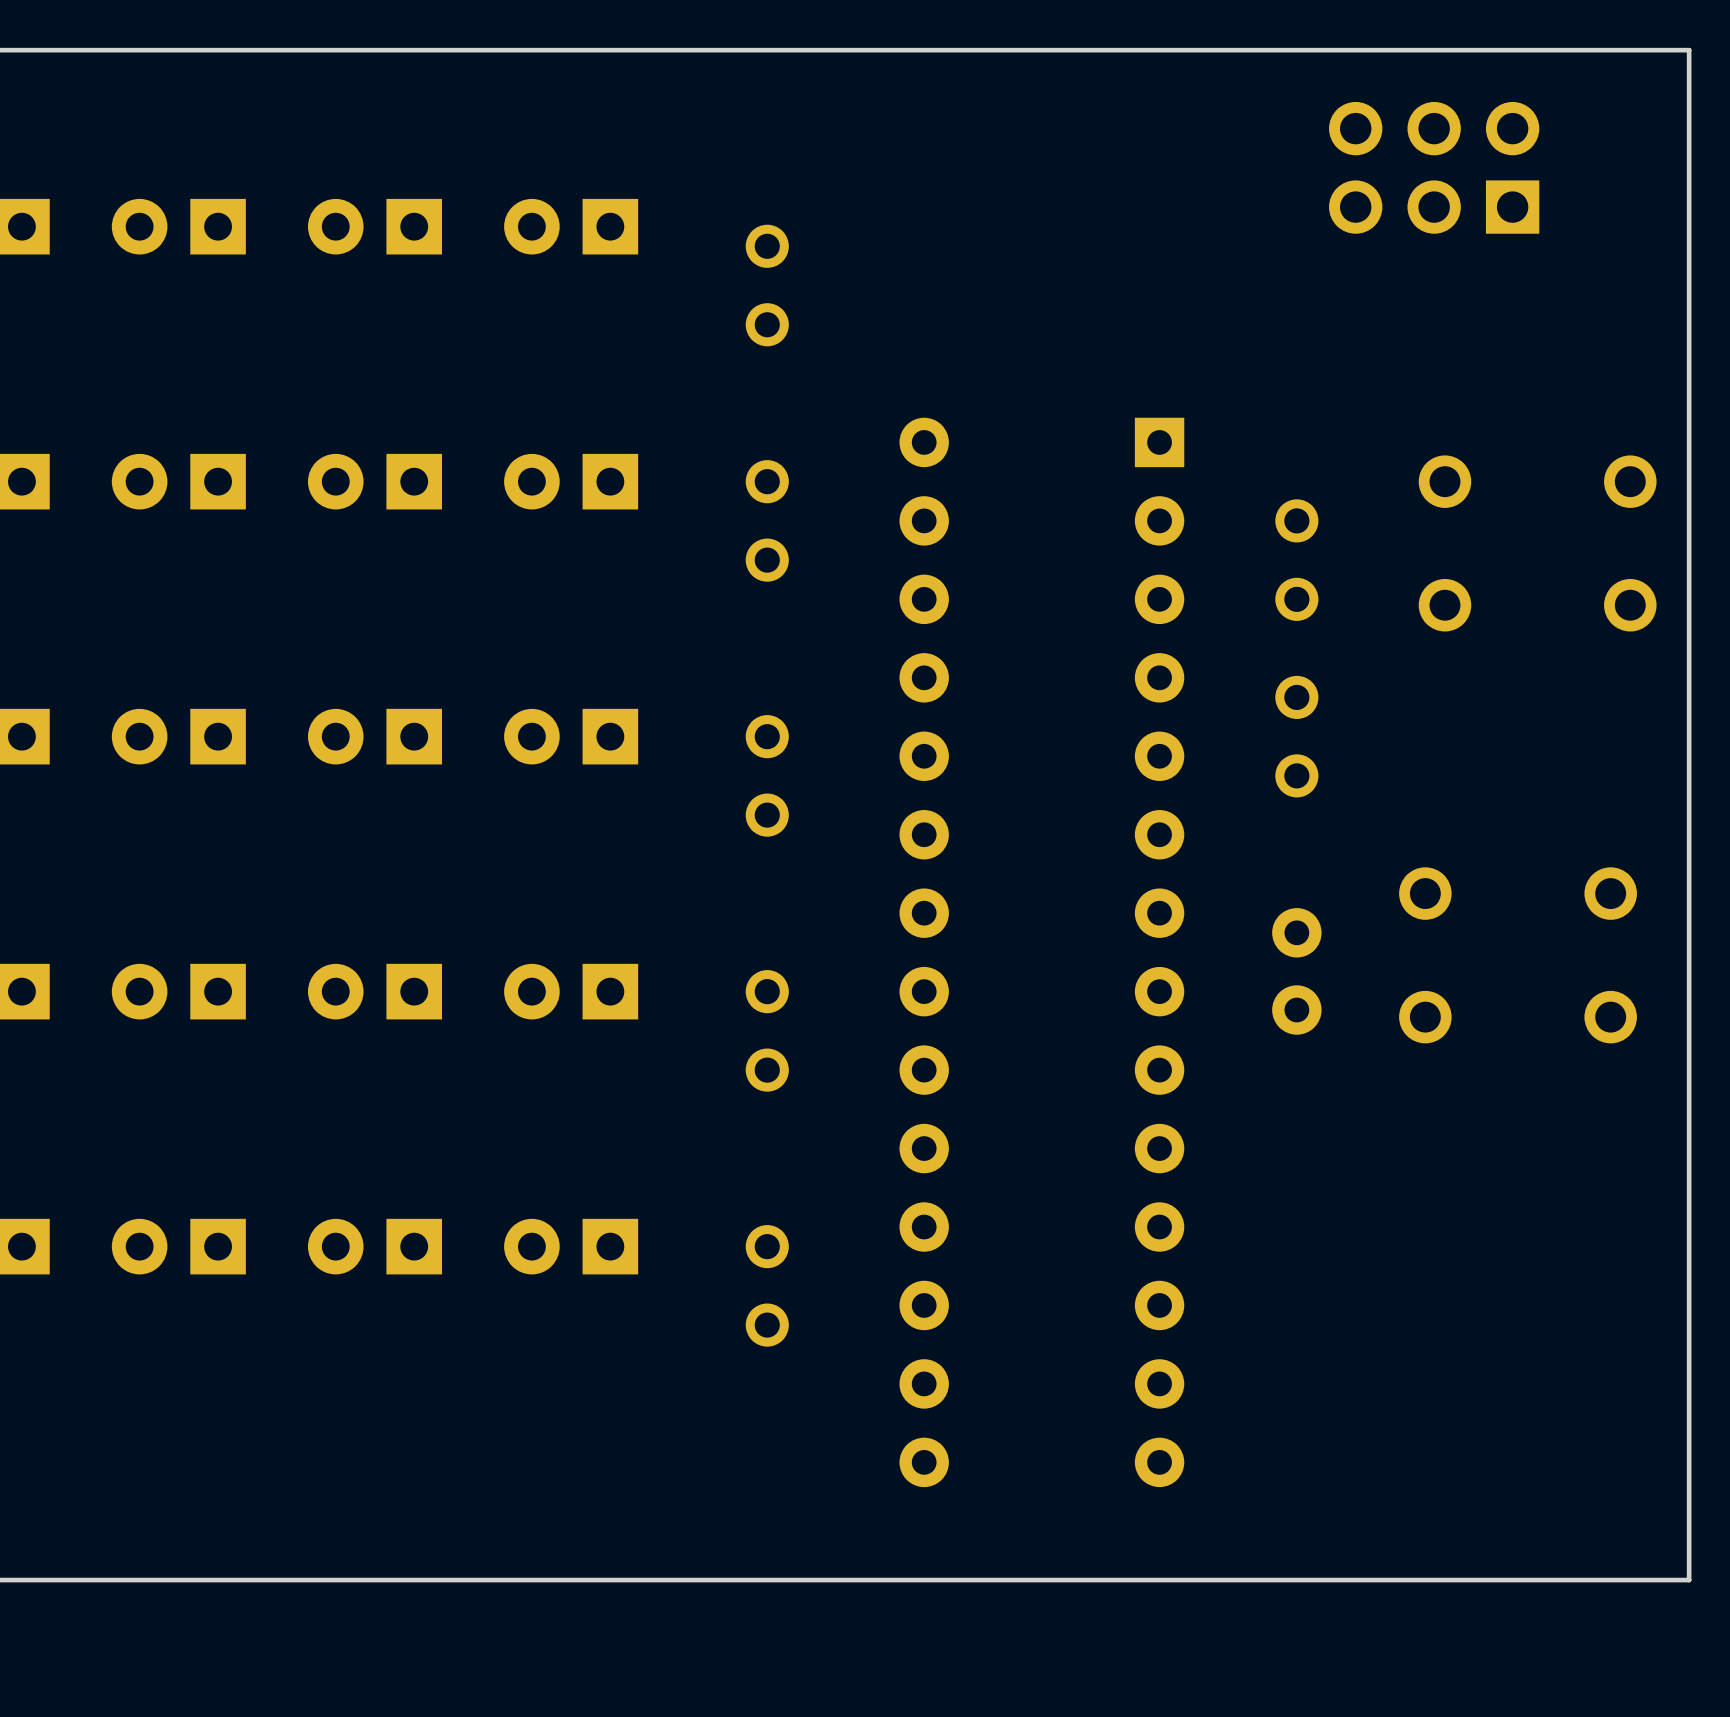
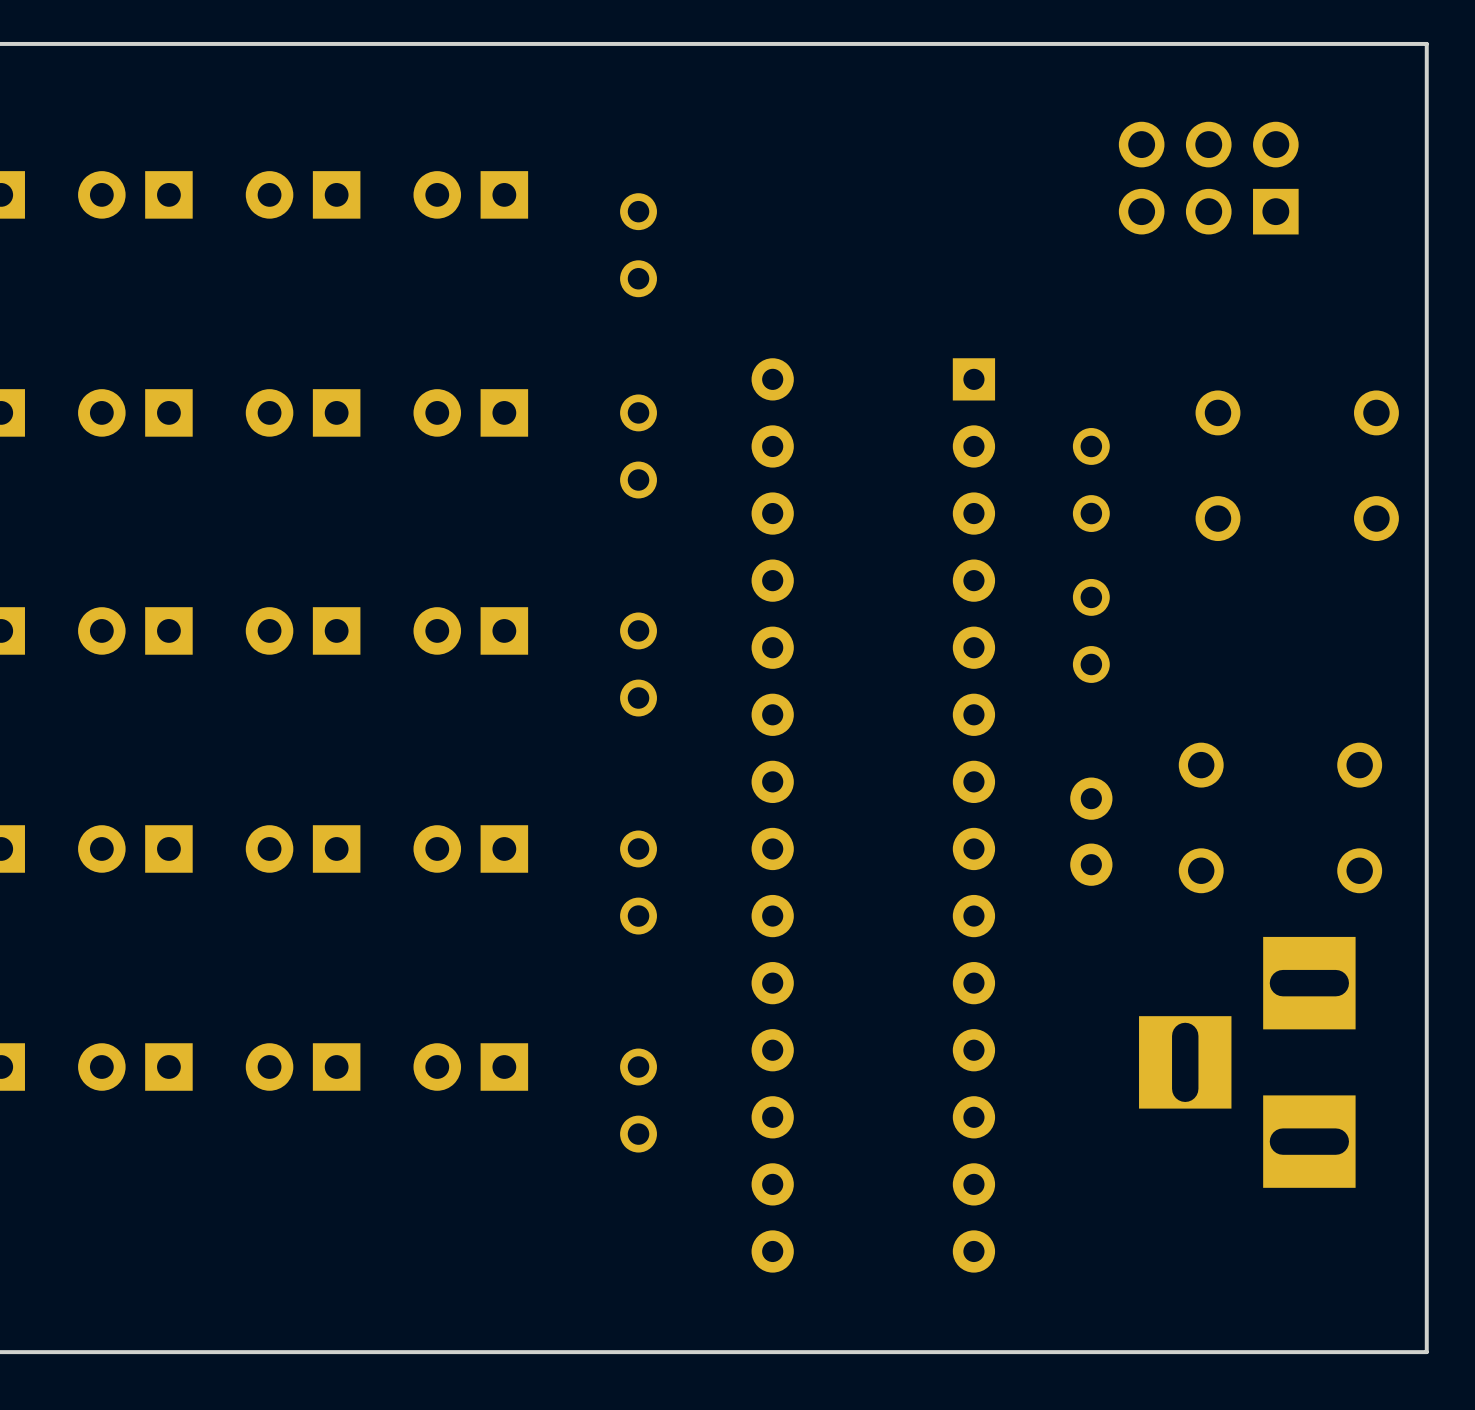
part position: (1434, 167) -> (1208, 178)
part: none -> (1247, 1062)

